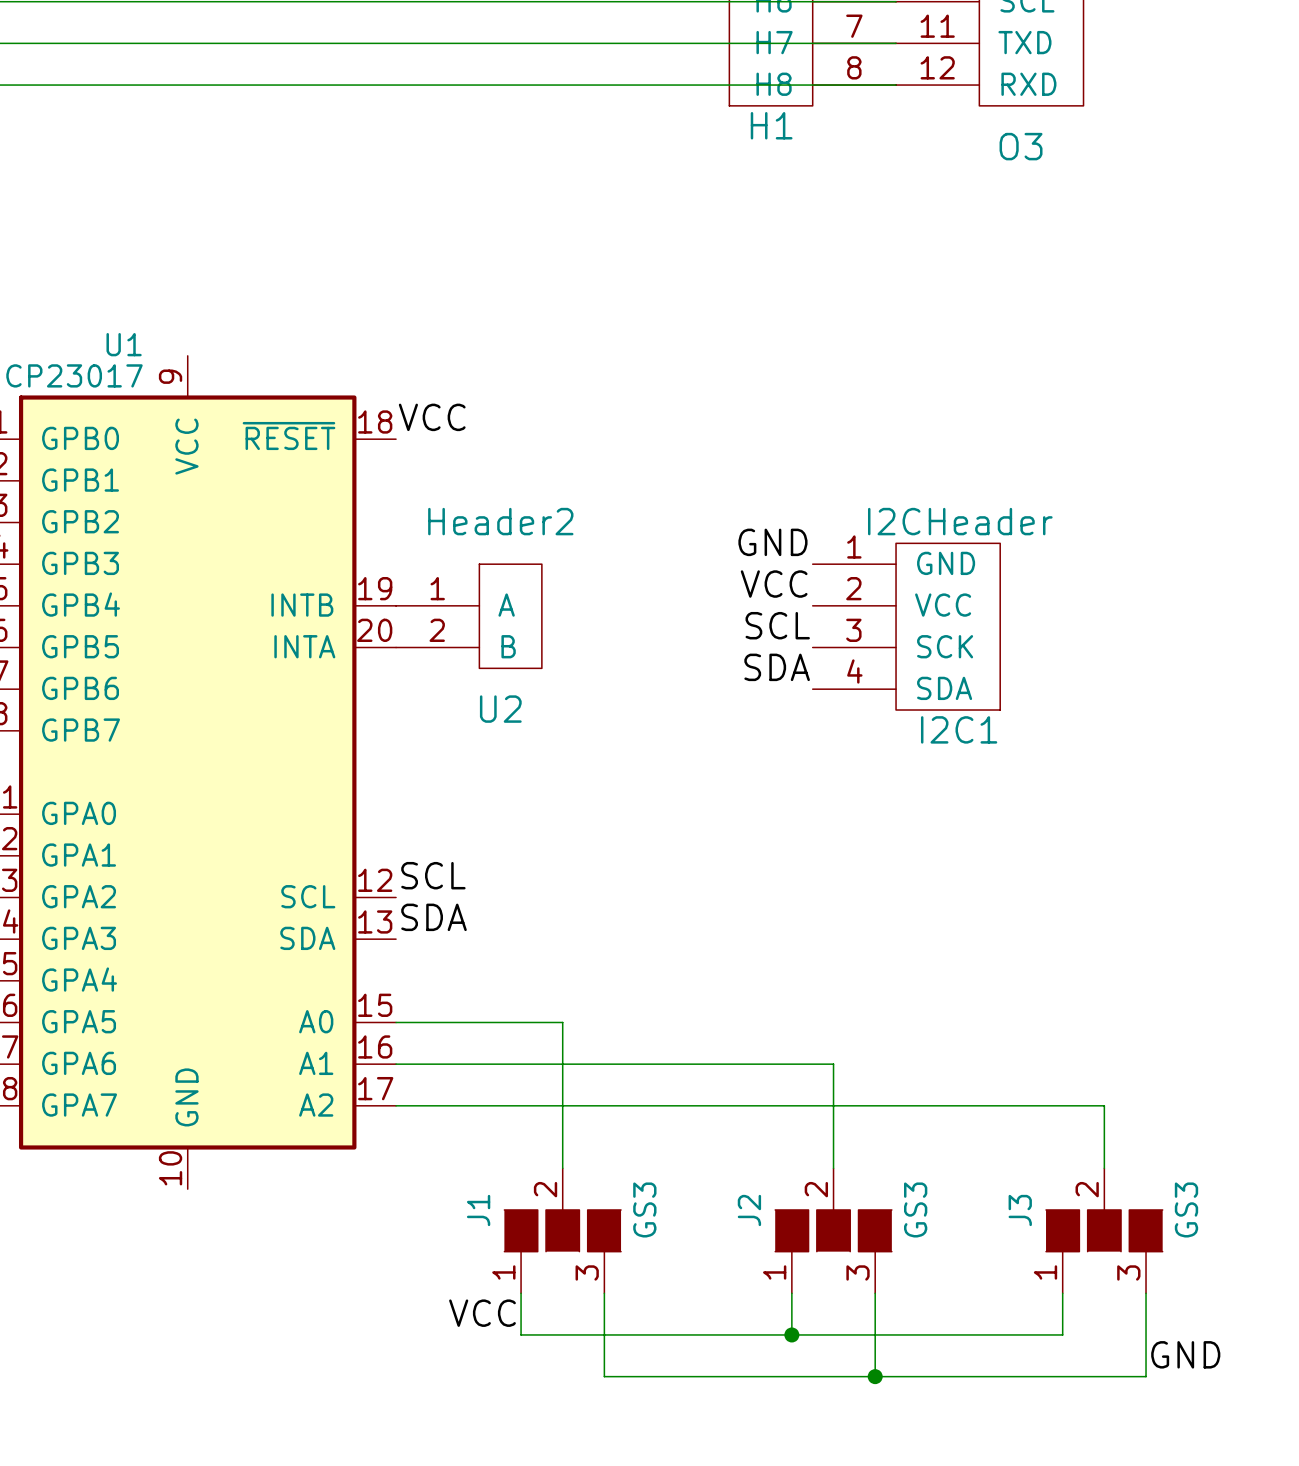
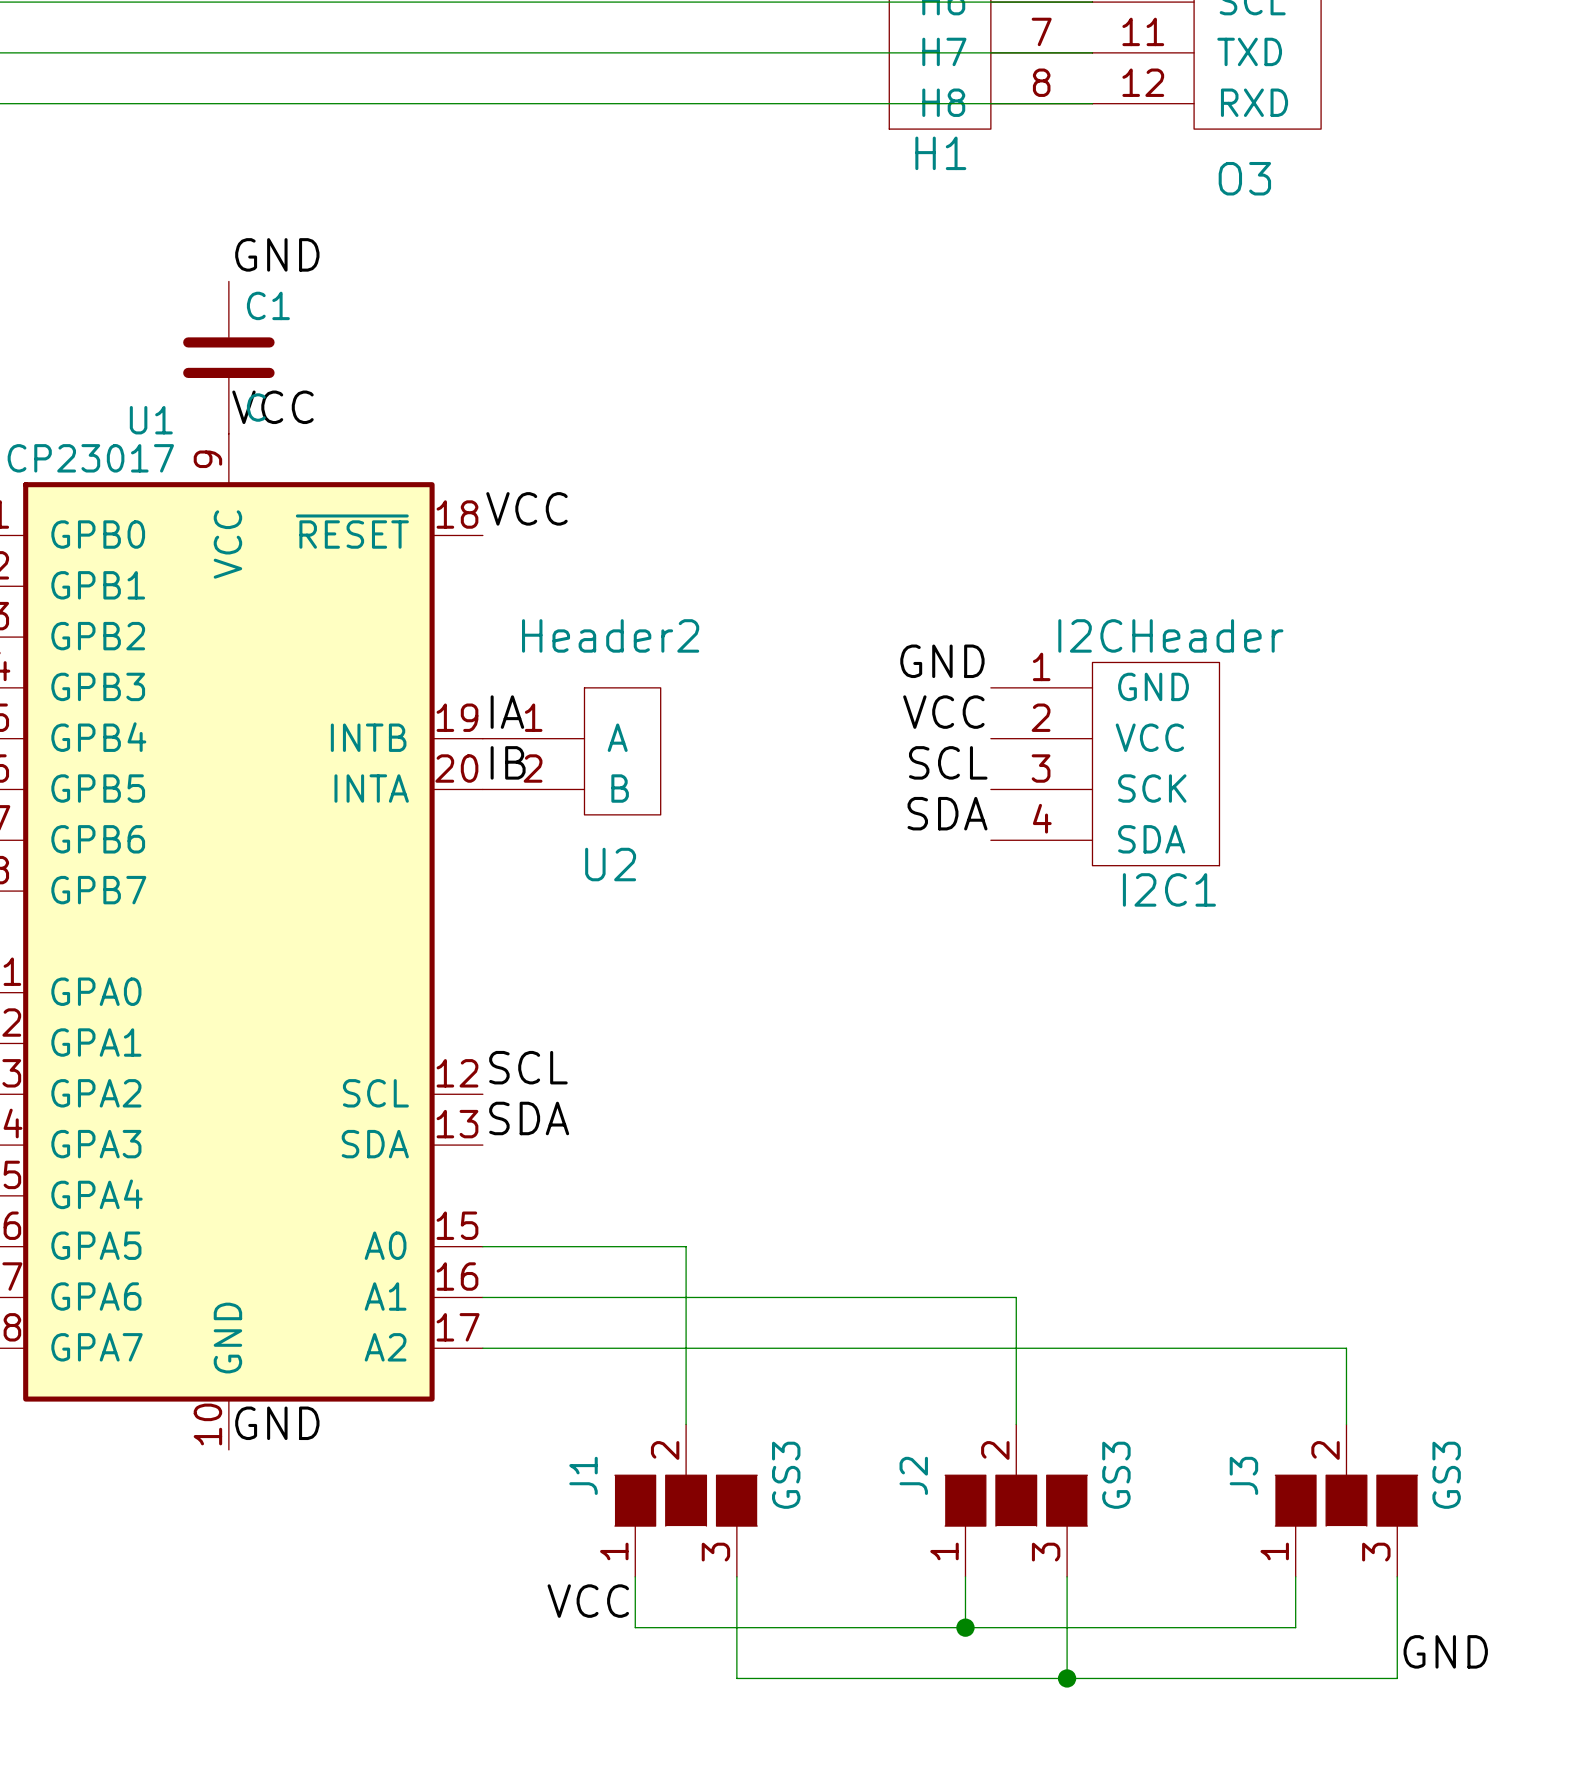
label: none -> GND (277, 254)
C1: none -> C (228, 357)
label: none -> VCC (272, 407)
label: none -> IA (507, 712)
label: none -> IB (508, 762)
label: none -> GND (277, 1423)

